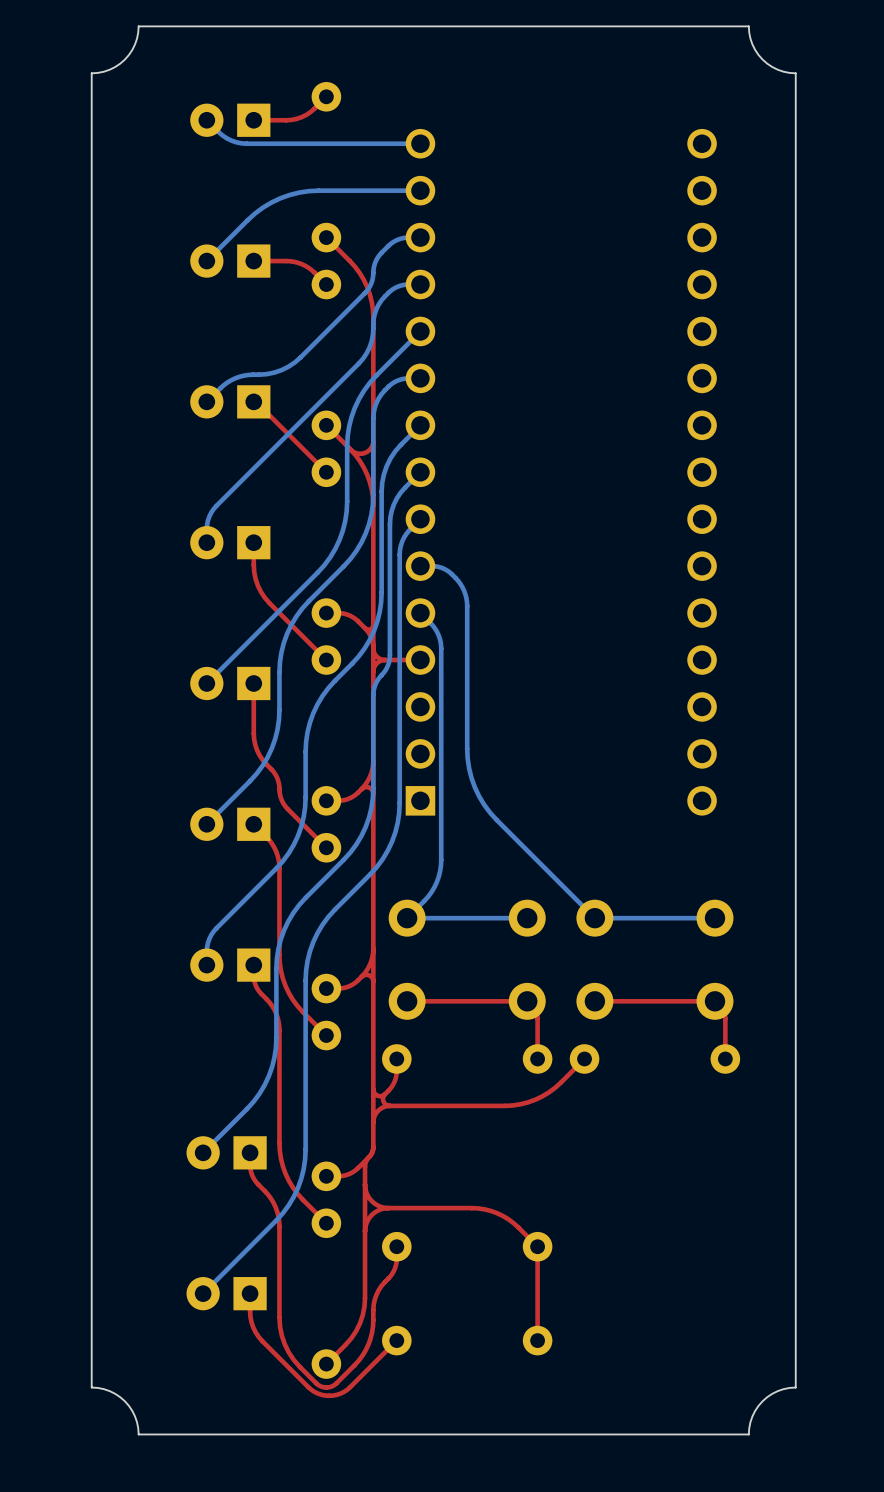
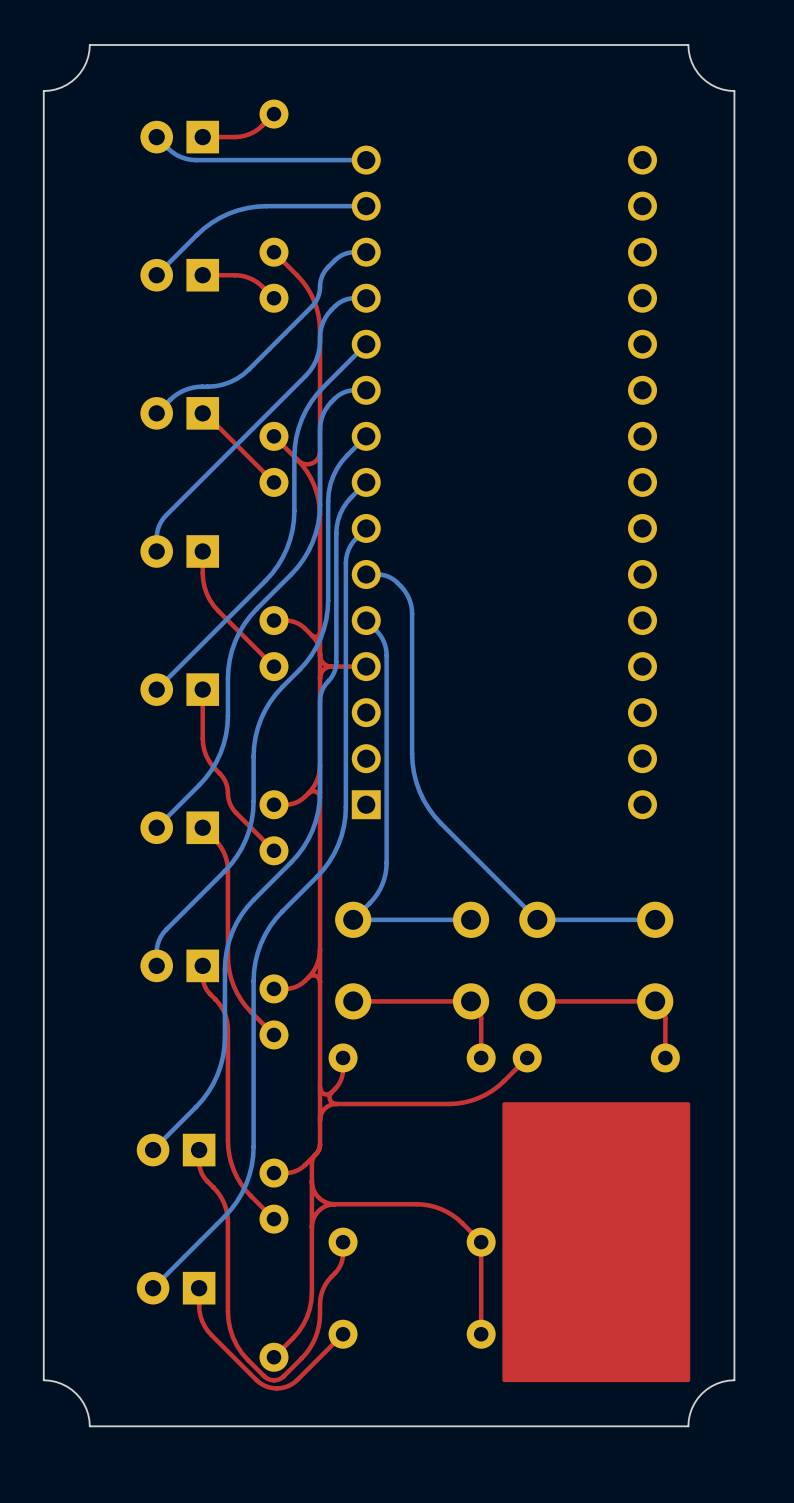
drawing: none -> [502, 1102, 691, 1383]

